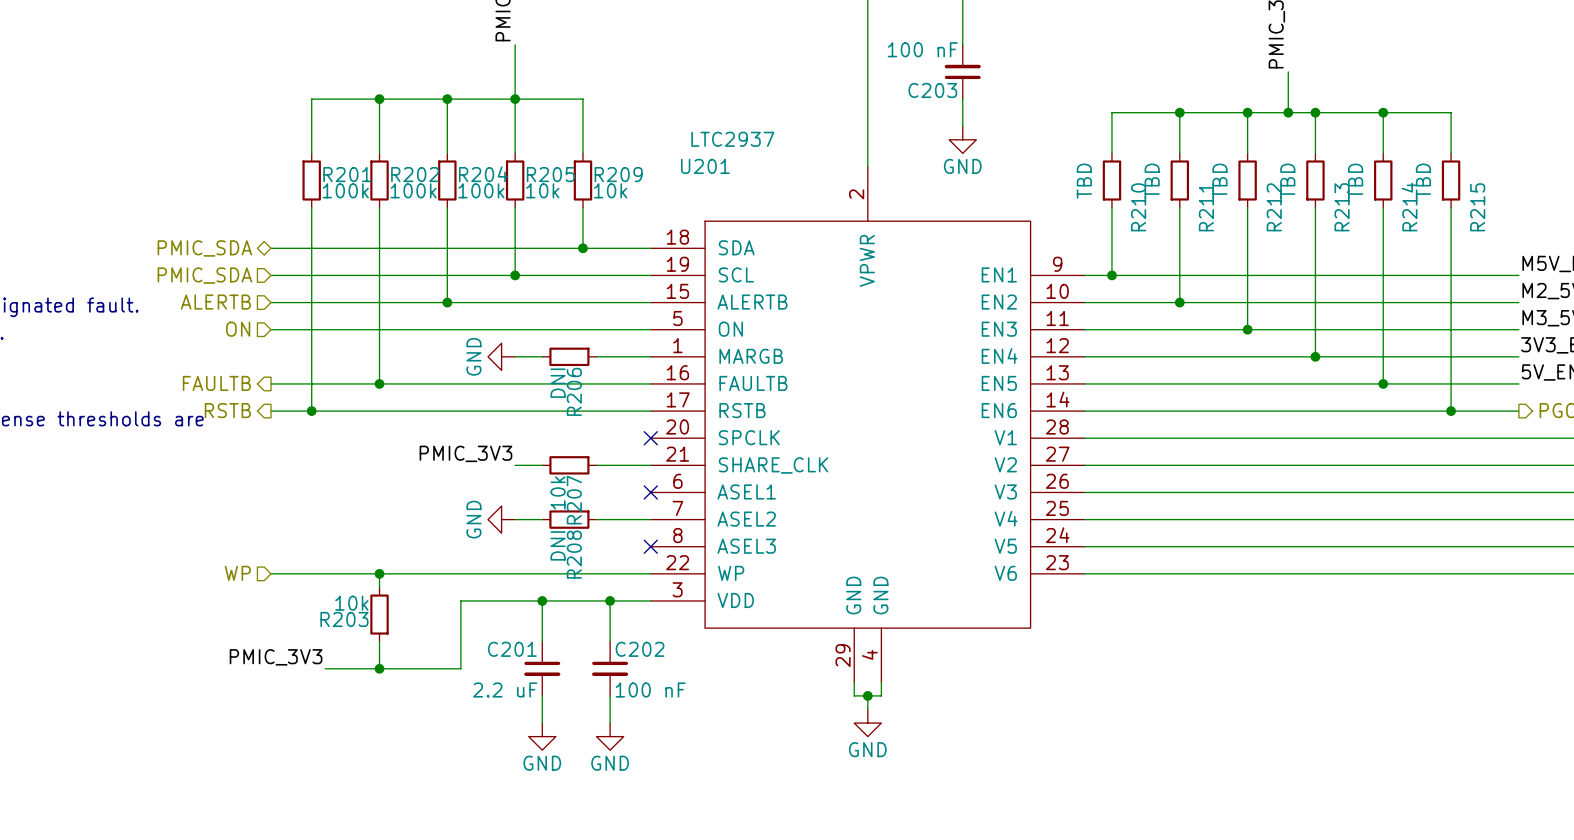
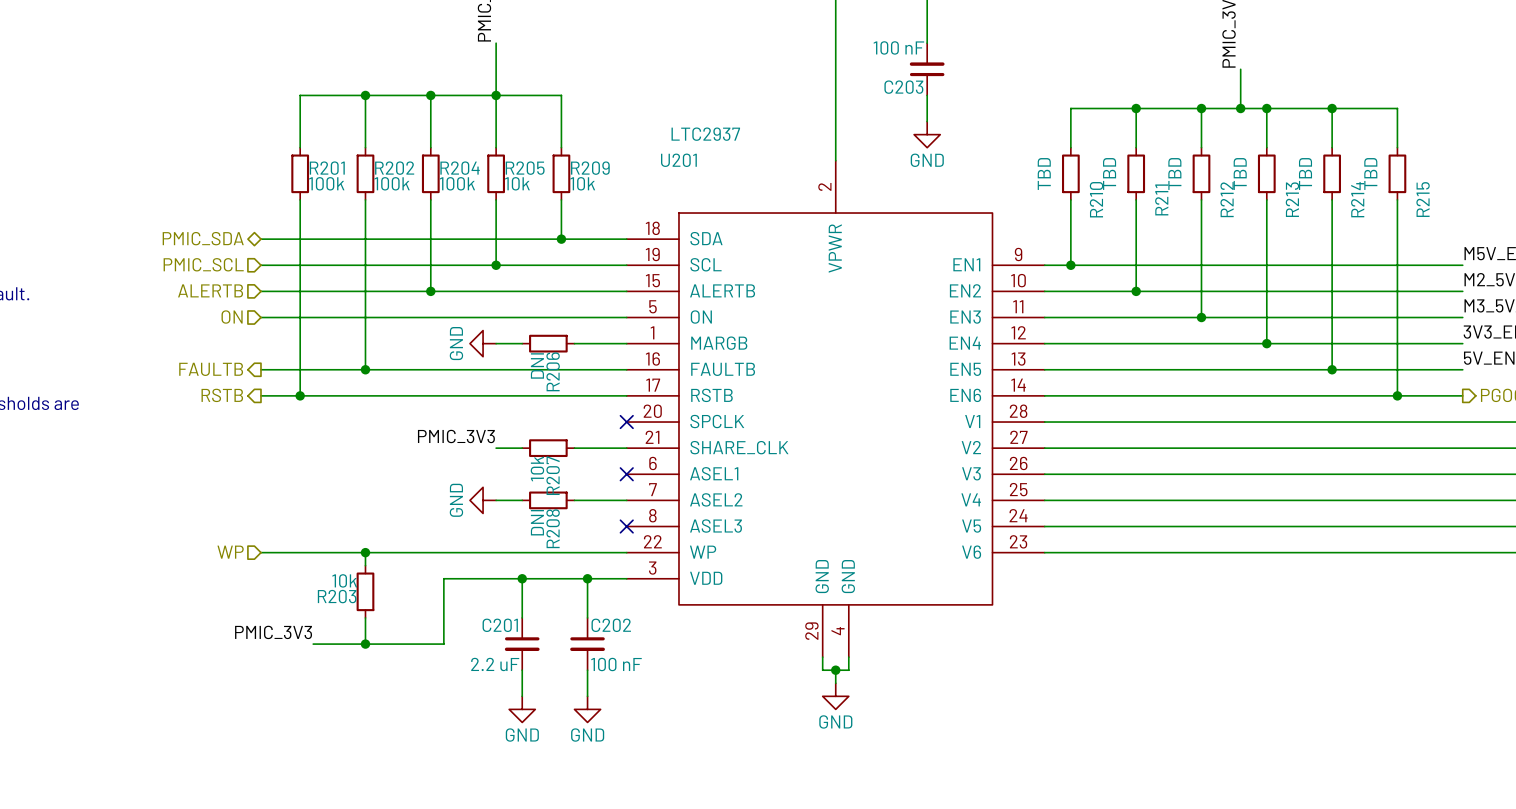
hierarchical label: PMIC_SDA (204, 275) -> PMIC_SCL (203, 264)

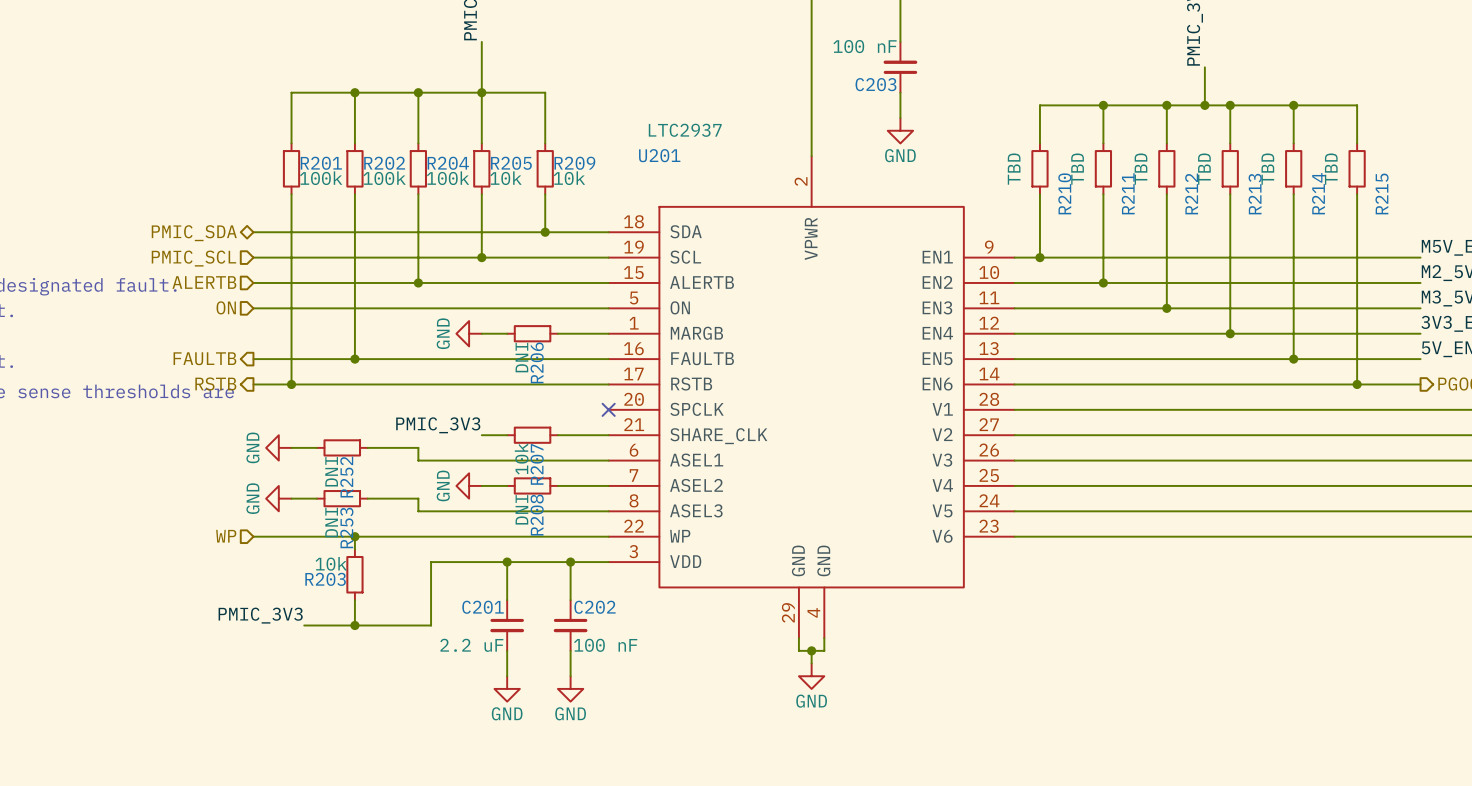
power symbol: none -> GND (278, 447)
wire: none -> (291, 447) (316, 447)
R252: none -> DNI (342, 447)
wire: none -> (367, 447) (418, 447) (418, 460) (608, 460)
no-connect mark: (626, 474) -> none
power symbol: none -> GND (278, 498)
wire: none -> (291, 498) (316, 498)
R253: none -> DNI (342, 498)
wire: none -> (367, 498) (418, 498) (418, 511) (608, 511)
no-connect mark: (626, 526) -> none

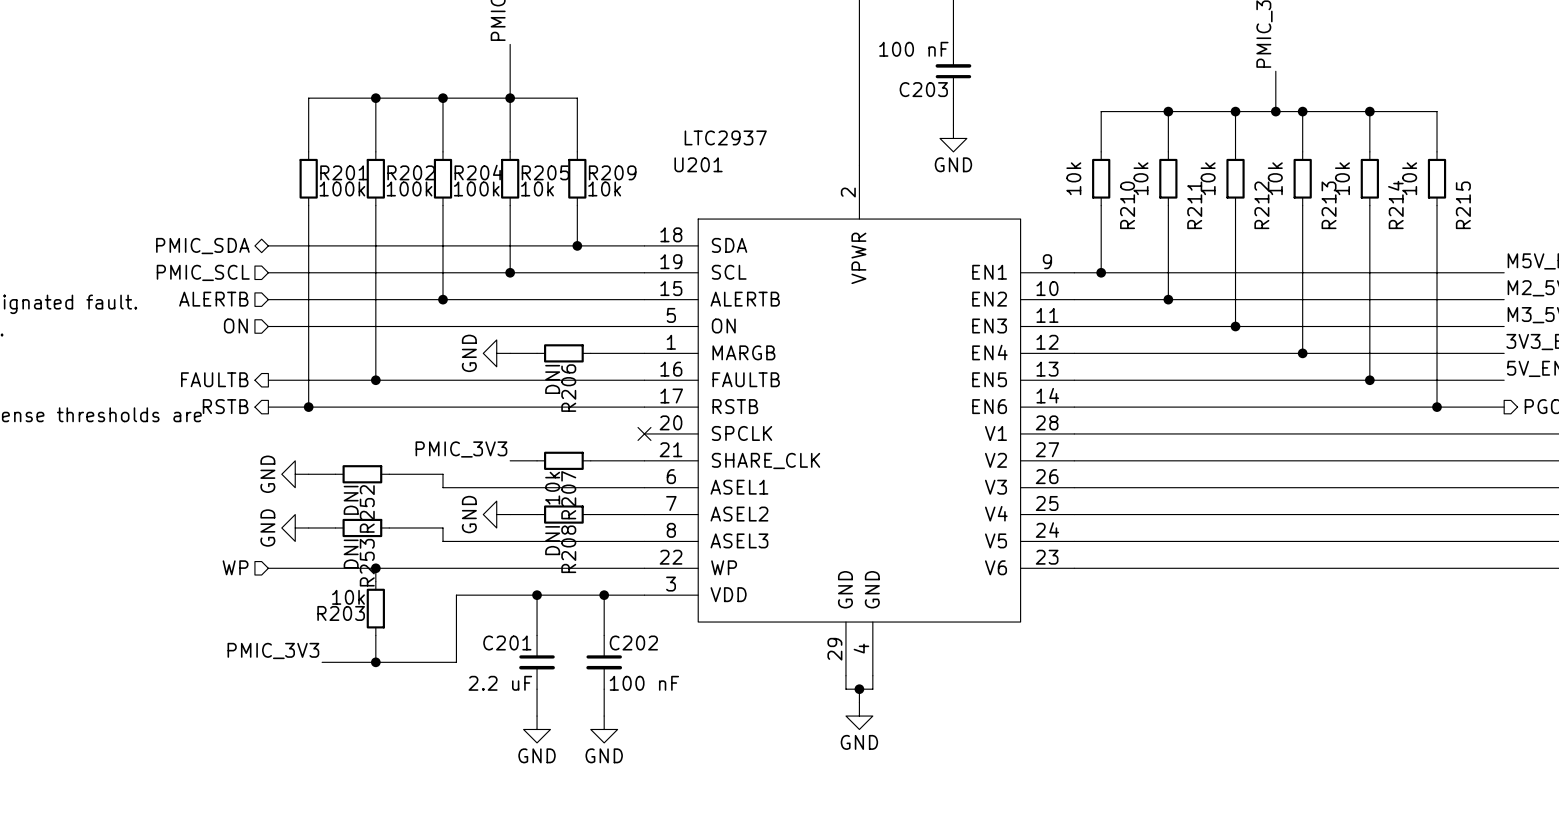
R210 value: TBD (1014, 169) -> 10k (1073, 178)
R211 value: TBD (1077, 169) -> 10k (1140, 178)
R212 value: TBD (1140, 169) -> 10k (1208, 178)
R213 value: TBD (1204, 169) -> 10k (1275, 178)
R214 value: TBD (1267, 169) -> 10k (1342, 178)
R215 value: TBD (1331, 169) -> 10k (1409, 178)

